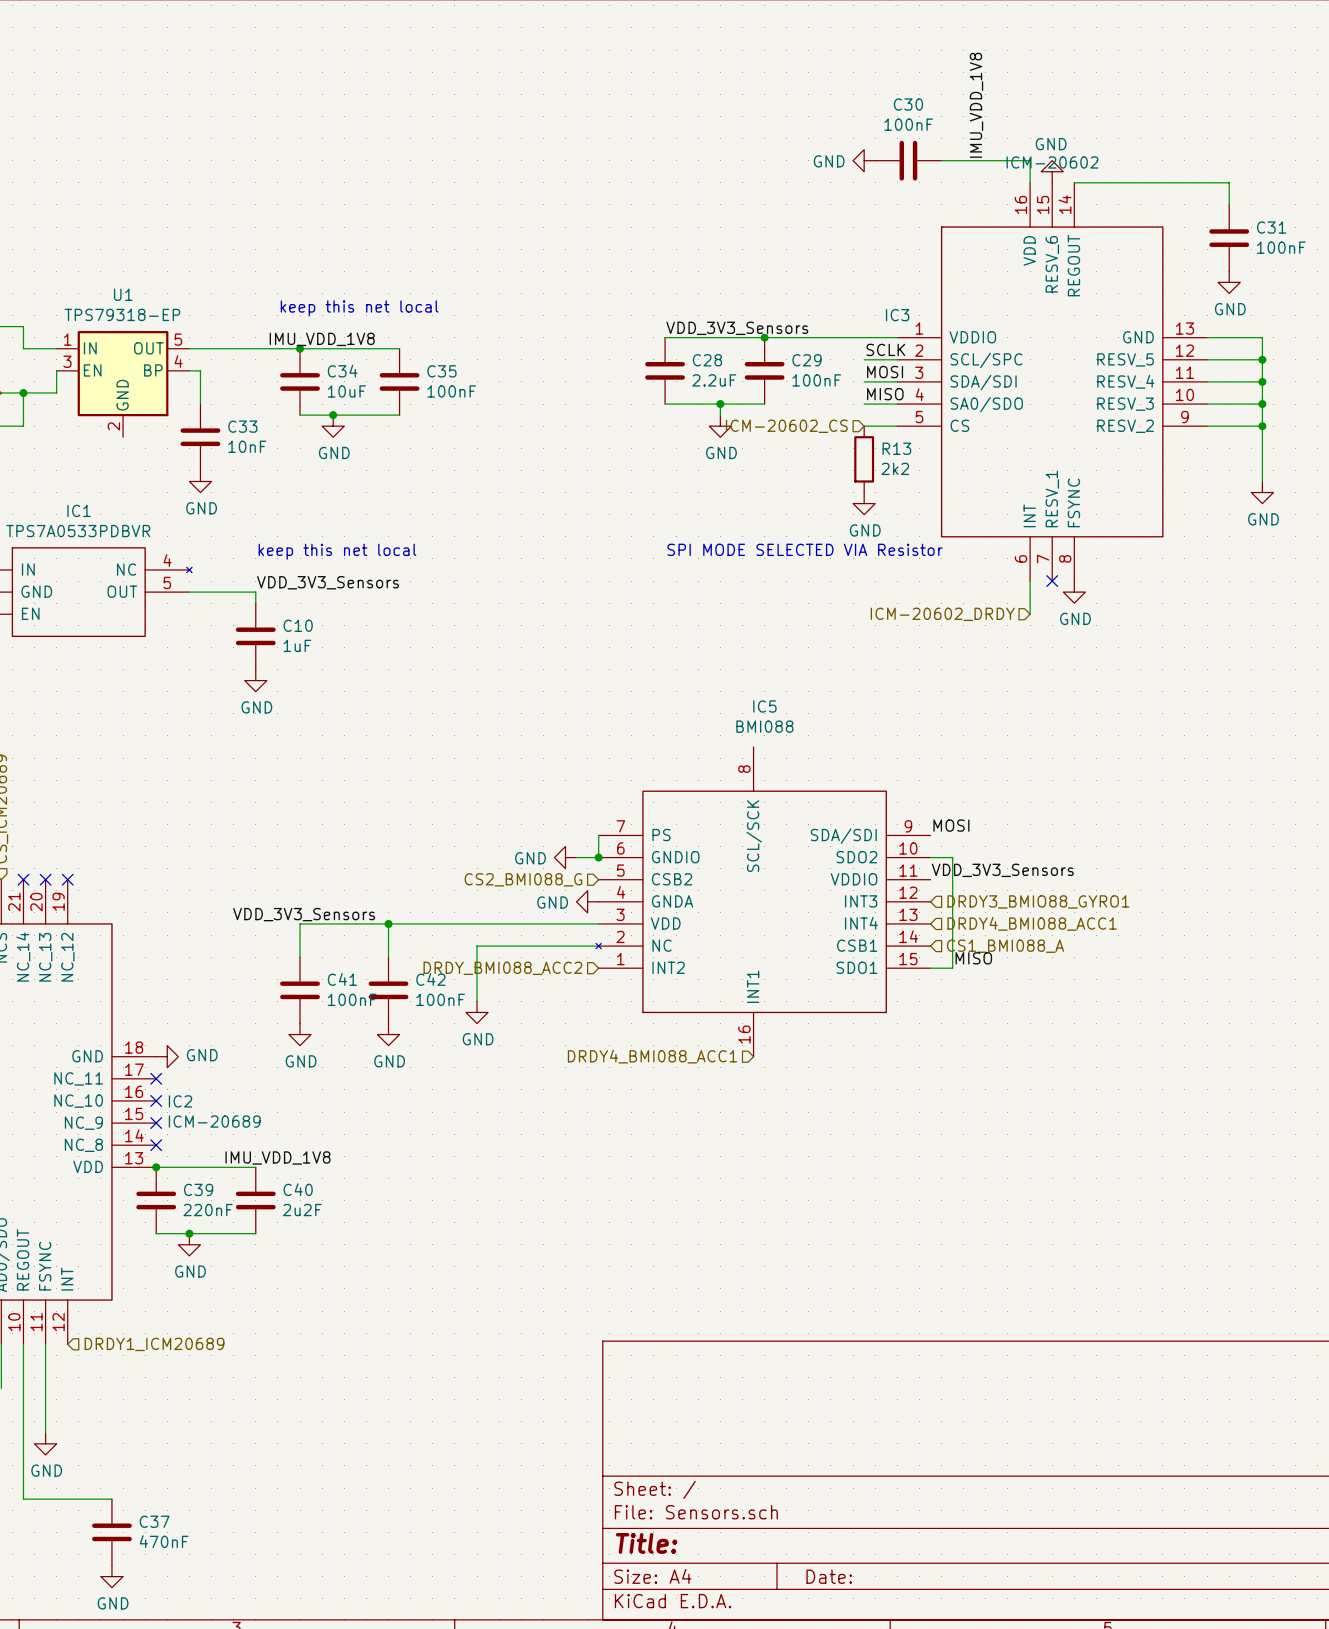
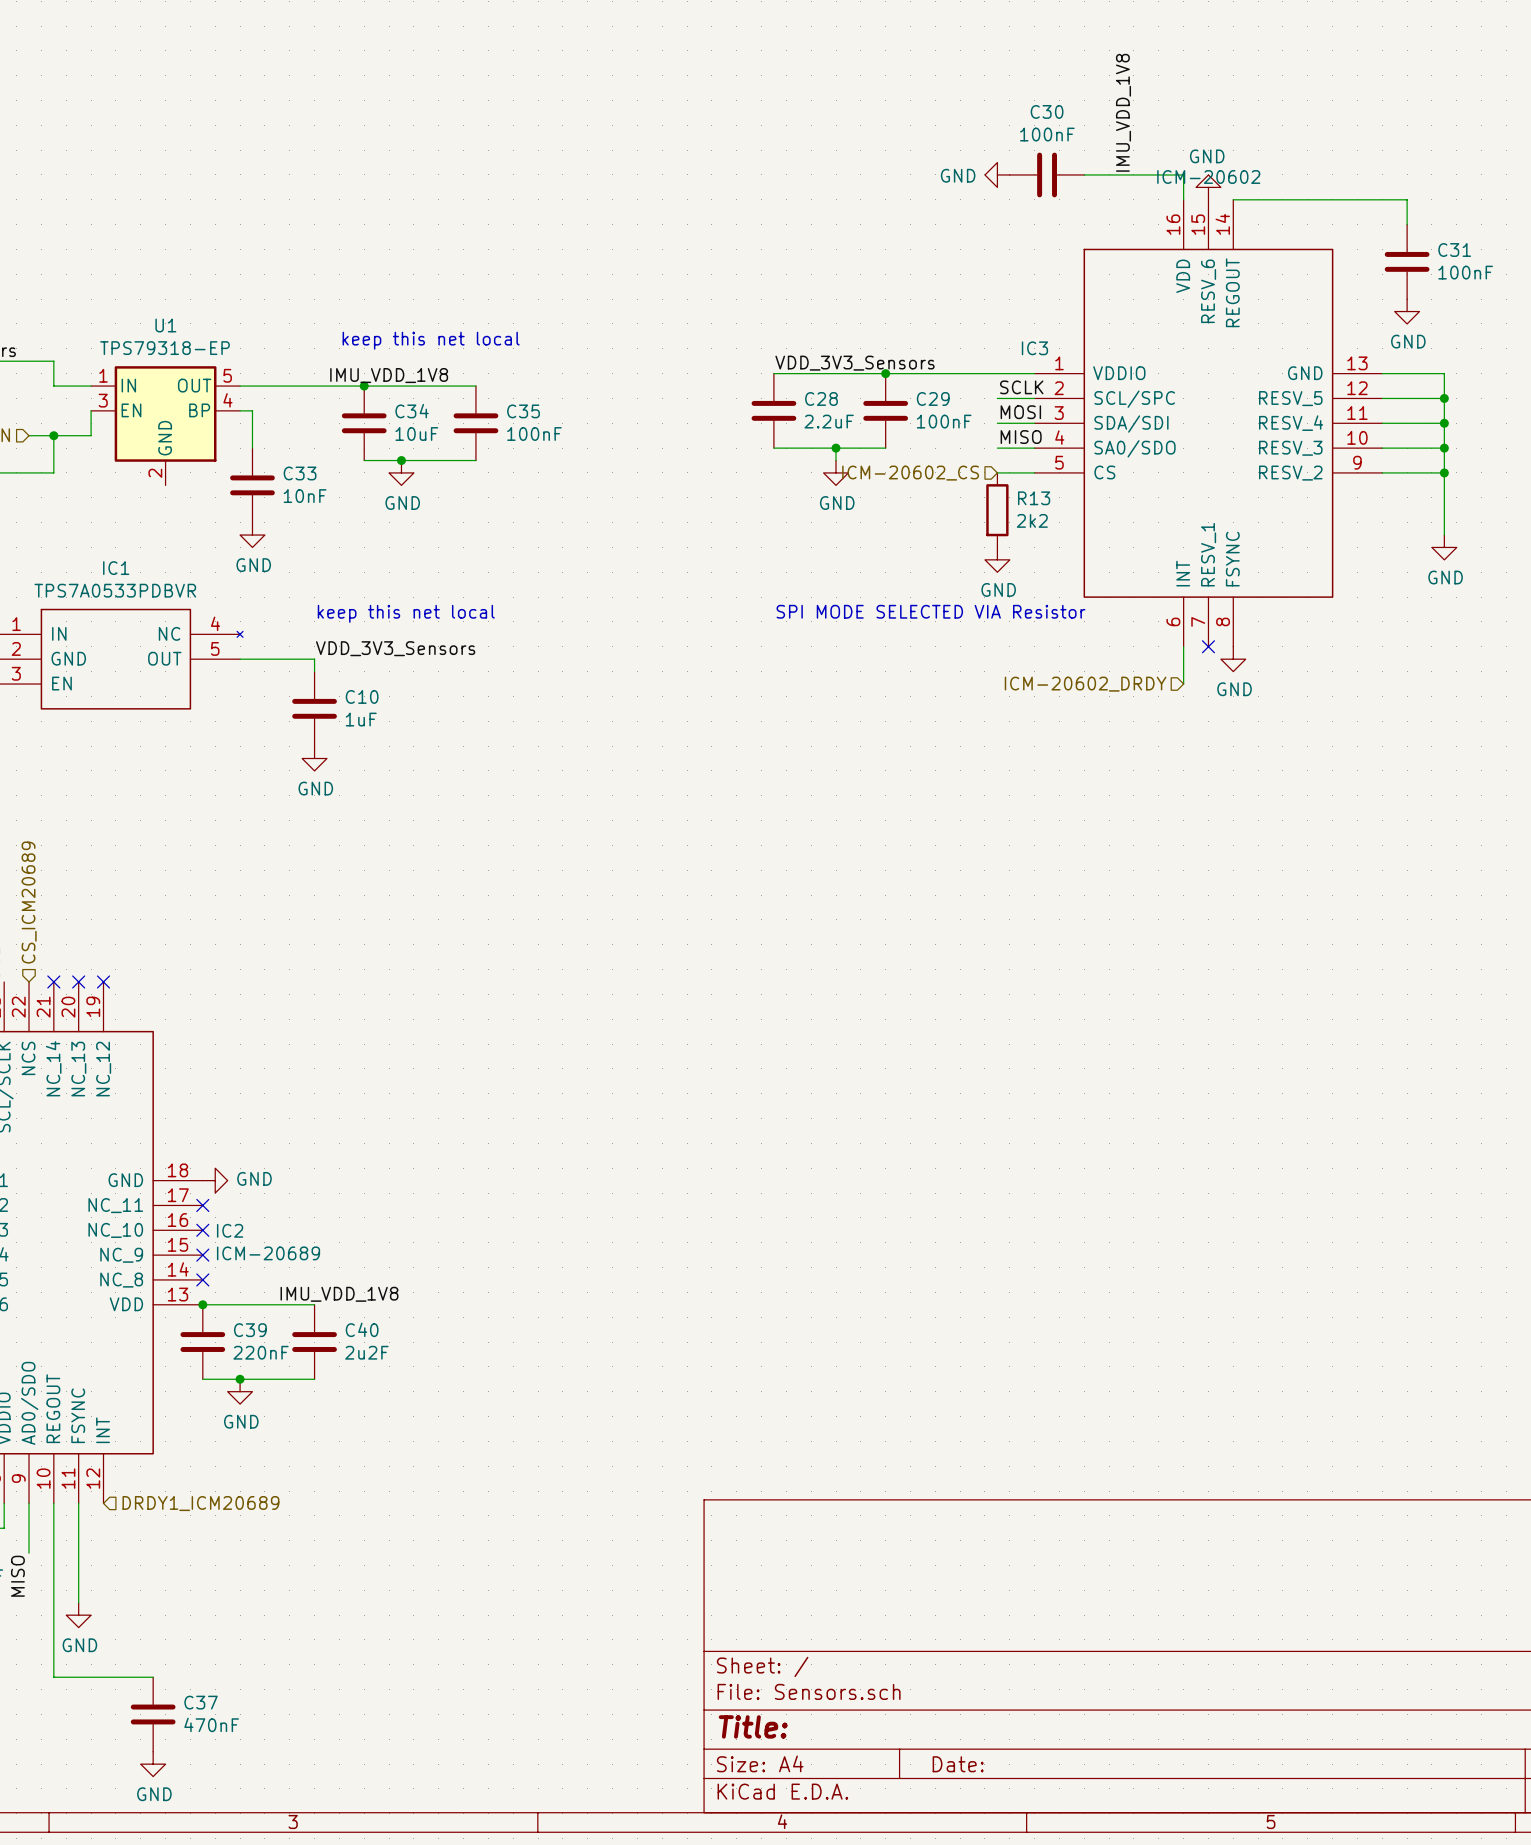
label: MOSI (951, 825) -> none
wire: (598, 835) (598, 857) (576, 857) -> none
power symbol: GND (565, 857) -> none
junction: (598, 857) -> none
wire: (930, 857) (952, 857) (952, 968) (930, 968) -> none
label: VDD_3V3_Sensors (1002, 870) -> none
hierarchical label: CS2_BMI088_G (523, 879) -> none
power symbol: GND (587, 901) -> none
IC5: BMI088 (763, 901) -> none
hierarchical label: DRDY3_BMIO88_GYRO1 (1038, 901) -> none
label: VDD_3V3_Sensors (304, 914) -> none
wire: (388, 923) (388, 957) -> none
junction: (388, 923) -> none
wire: (598, 923) (300, 923) (300, 957) -> none
hierarchical label: DRDY4_BMI088_ACC1 (1032, 923) -> none
wire: (598, 946) (477, 946) (477, 1001) -> none
hierarchical label: CS1_BMI088_A (1005, 946) -> none
label: MISO (973, 958) -> none
hierarchical label: DRDY_BMI088_ACC2 (502, 968) -> none
C41: 100nF (300, 990) -> none
C42: 100nF (388, 990) -> none
power symbol: GND (477, 1012) -> none
power symbol: GND (300, 1034) -> none
power symbol: GND (388, 1034) -> none
hierarchical label: DRDY4_BMI088_ACC1 (652, 1056) -> none

